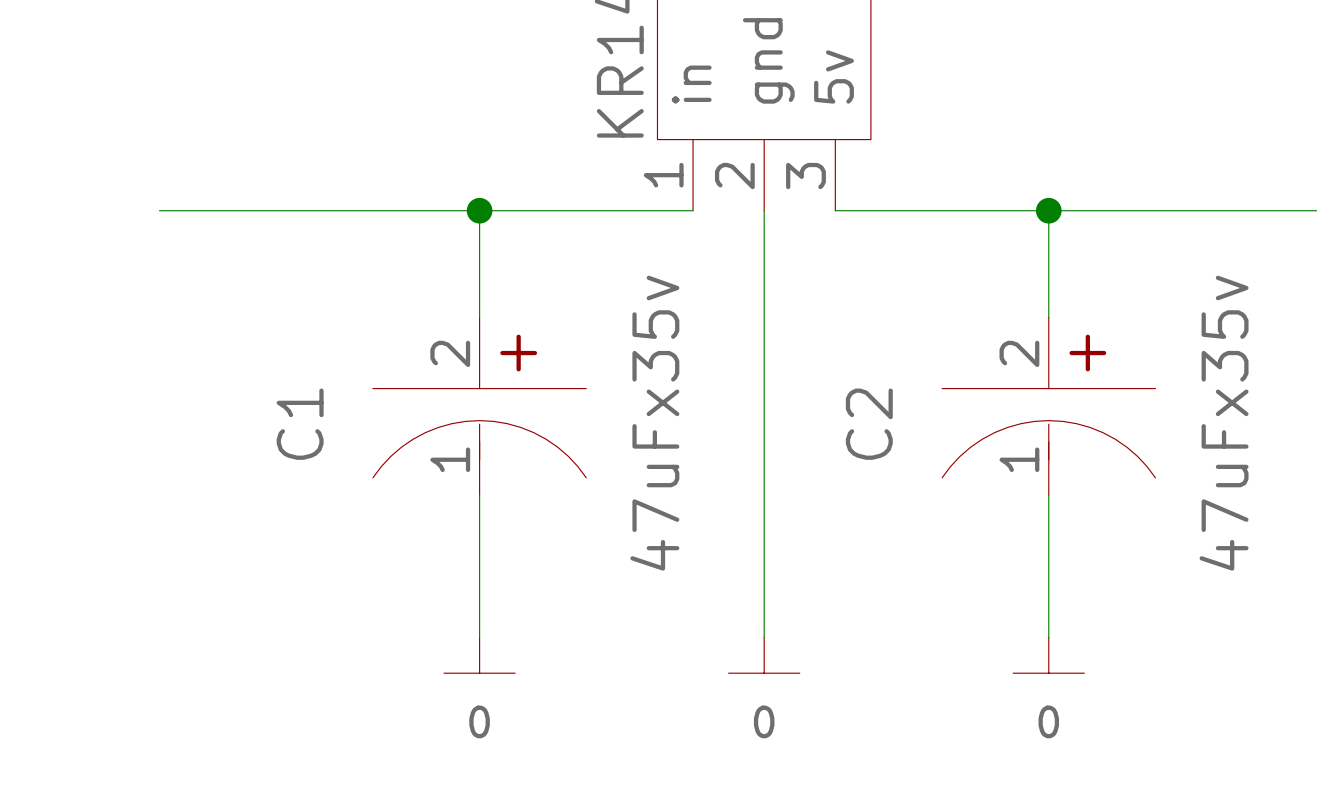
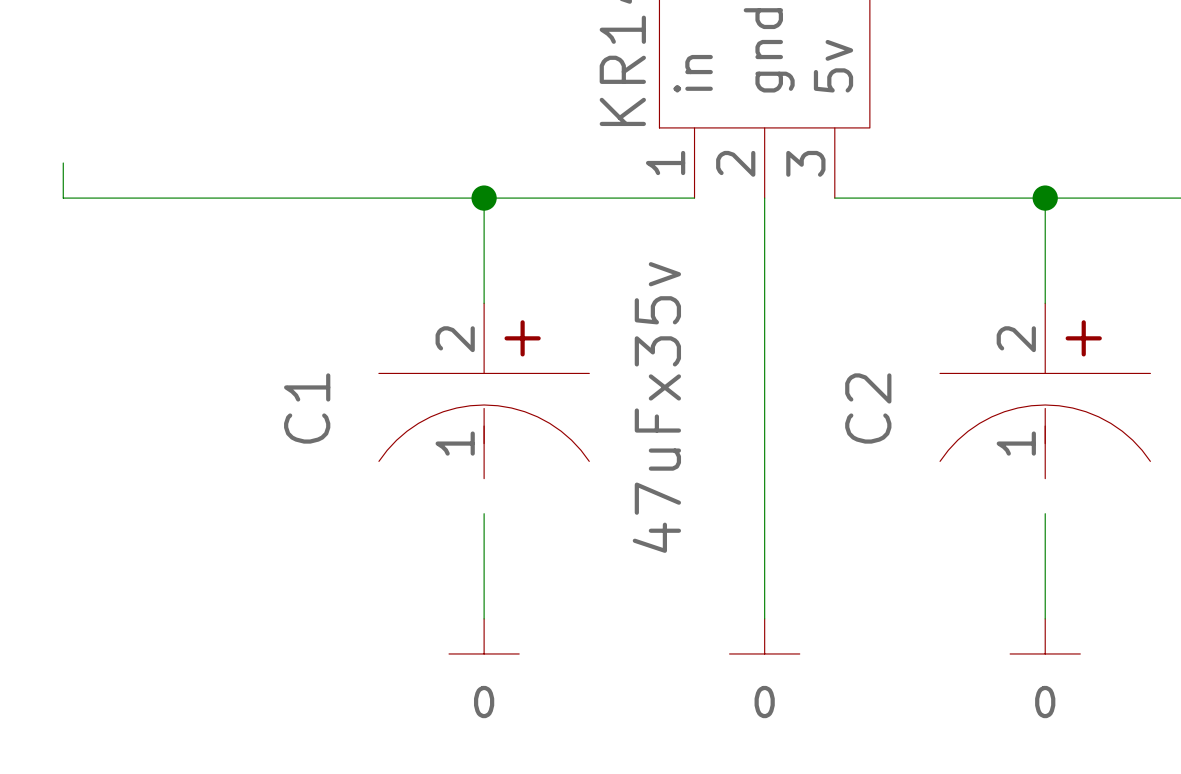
wire: none -> (63, 163) (63, 198) (168, 198)
wire: (479, 495) (479, 530) -> none
wire: (1048, 495) (1048, 530) -> none

